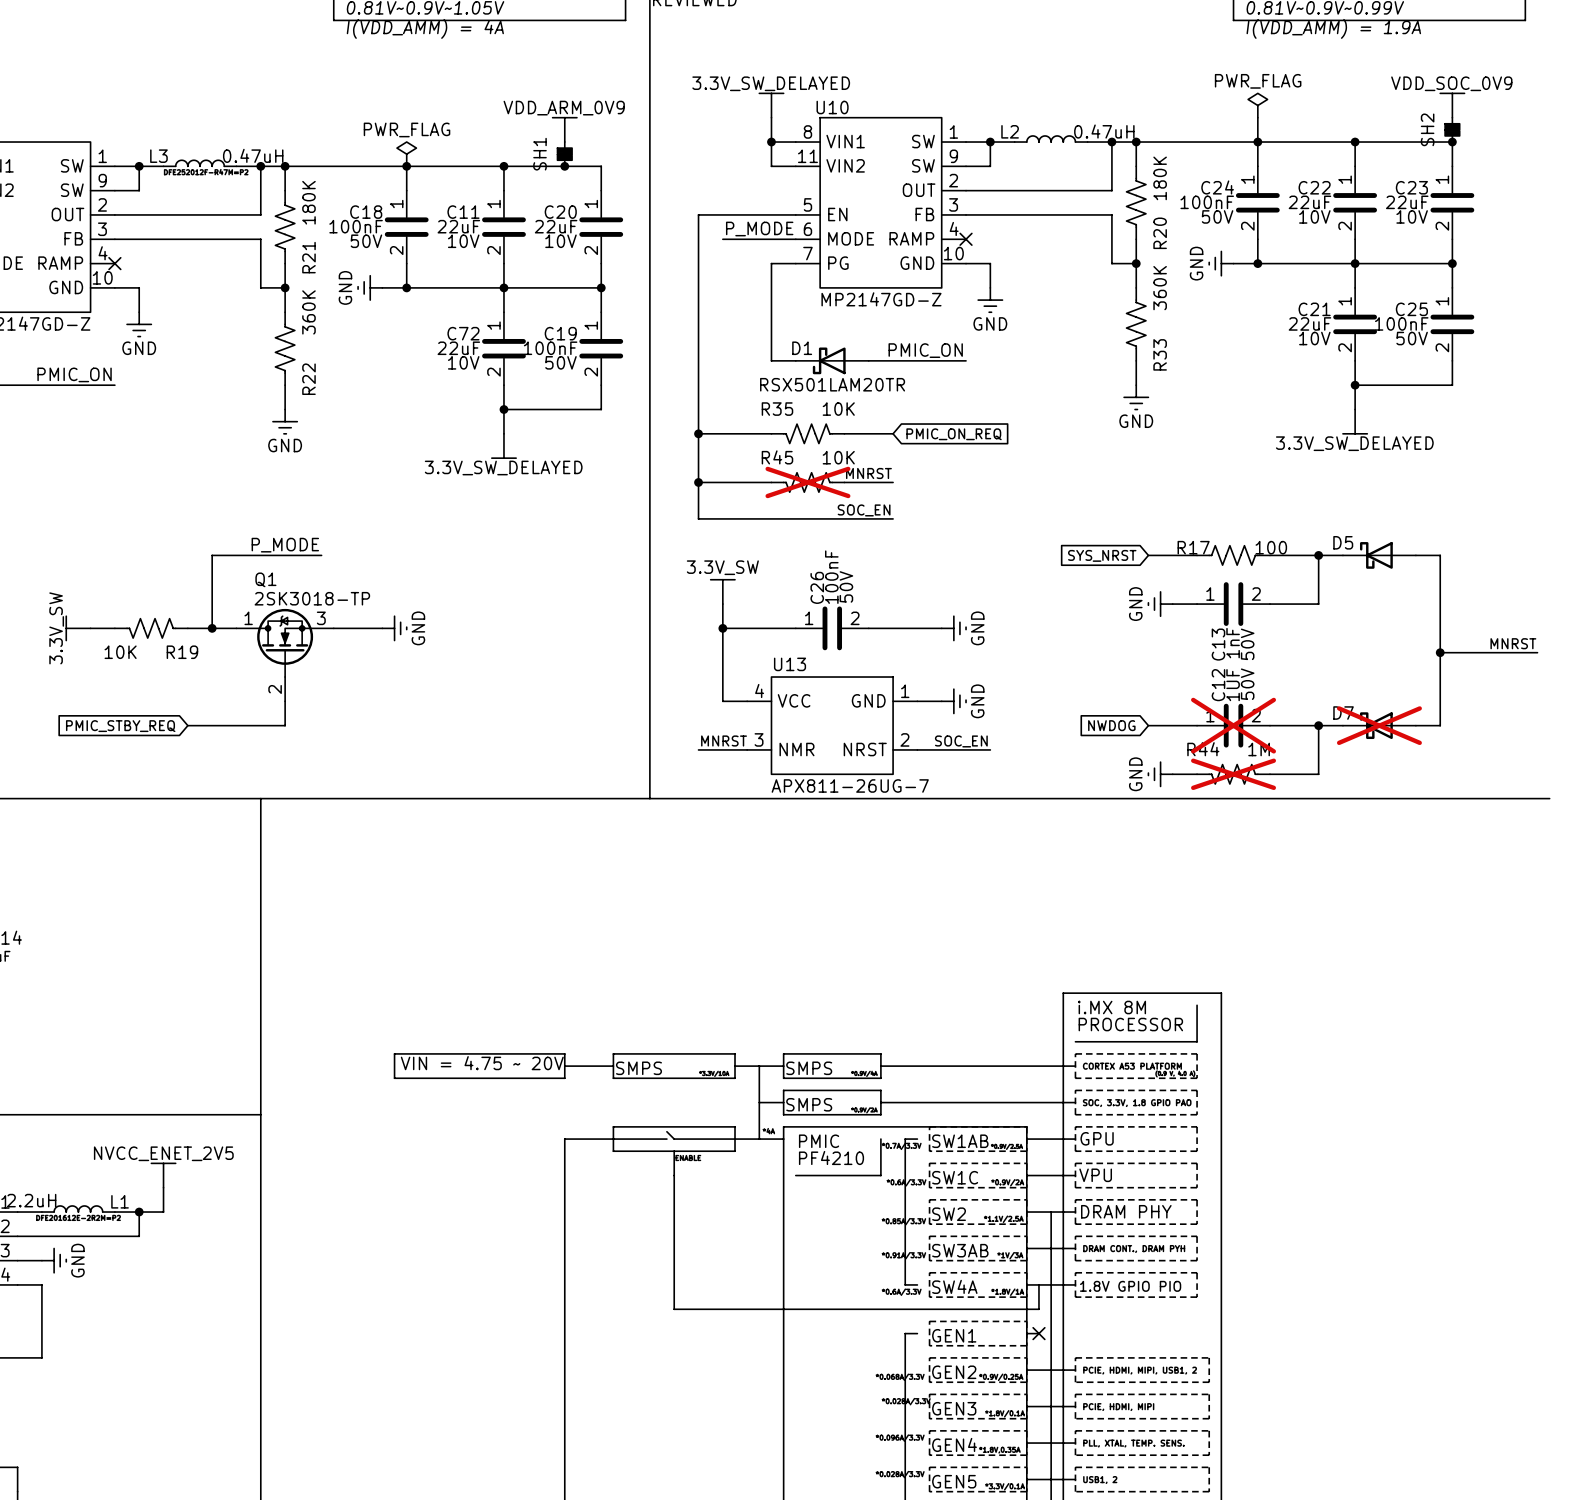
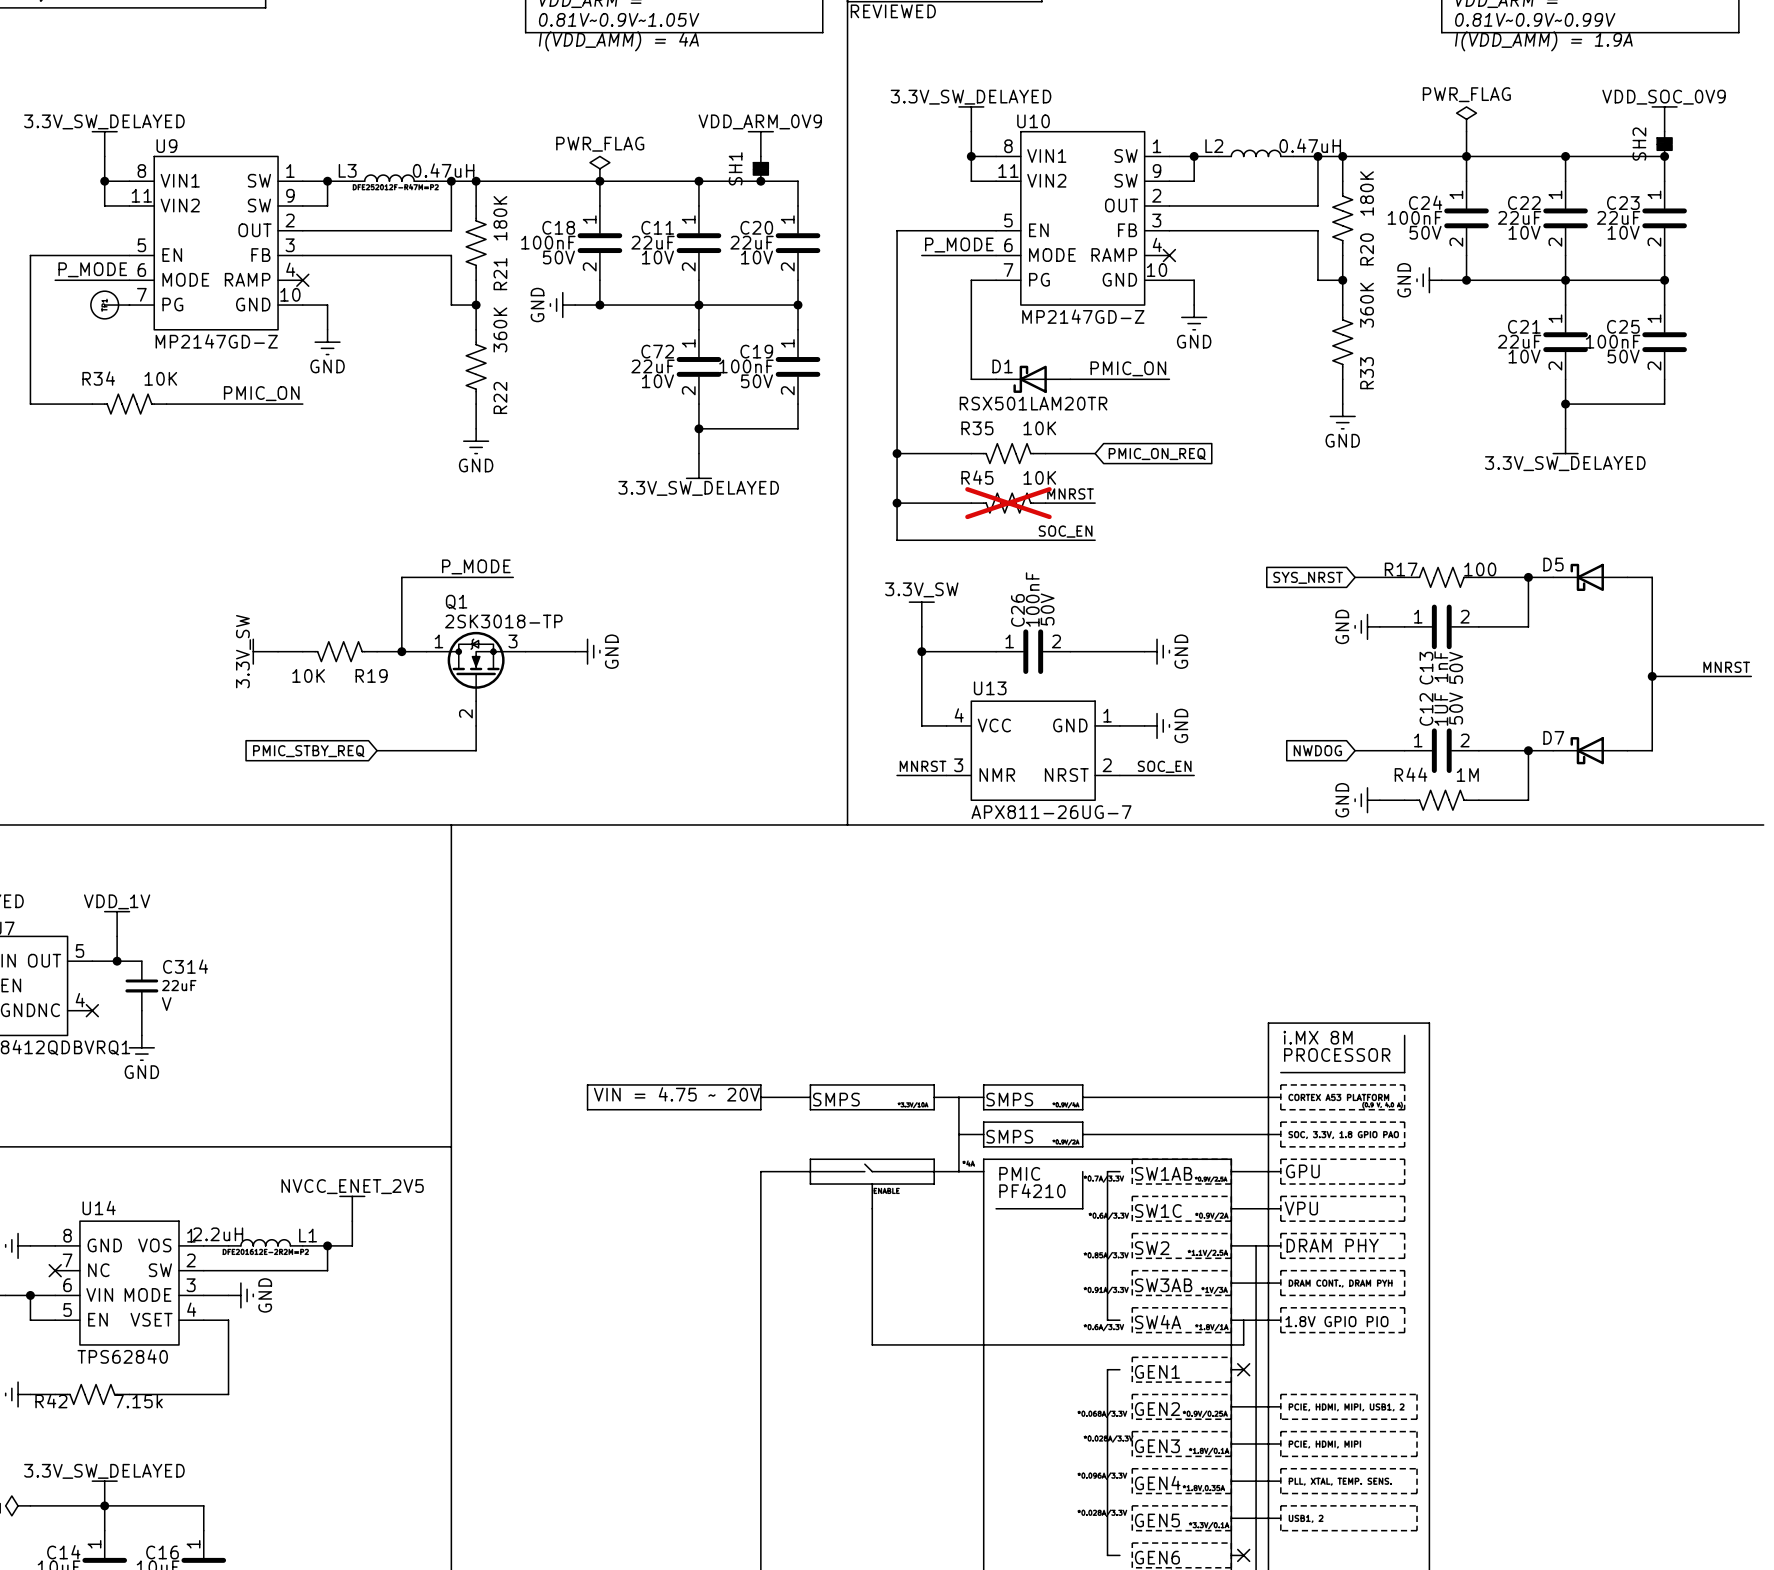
C12 do-not-place cross: (1233, 725) -> none
D7 do-not-place cross: (1379, 725) -> none
R44 do-not-place cross: (1233, 774) -> none

